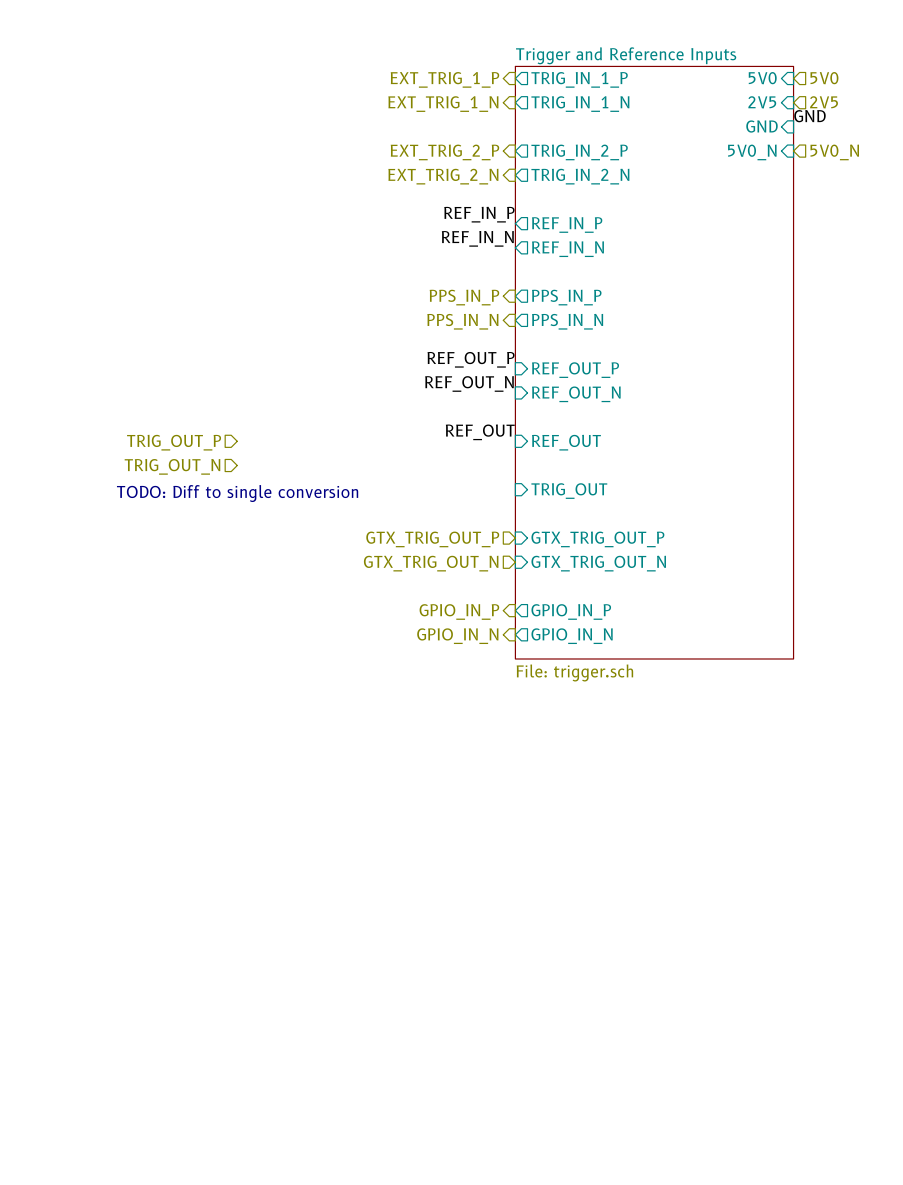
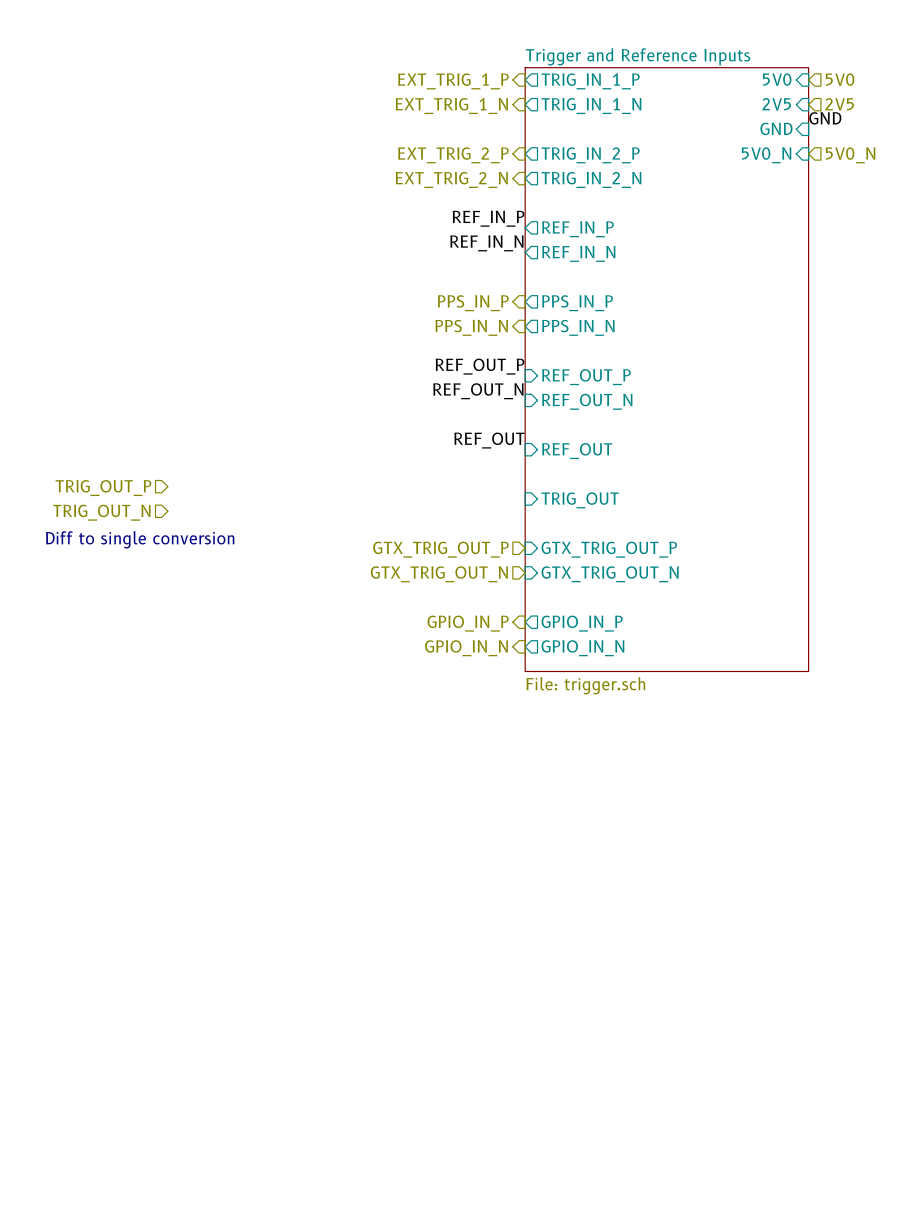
hierarchical label position: TRIG_OUT_P (174, 442) -> TRIG_OUT_P (103, 488)
hierarchical label position: TRIG_OUT_N (172, 466) -> TRIG_OUT_N (101, 512)
text: TODO: Diff to single conversion (237, 493) -> none
text: none -> Diff to single conversion (140, 539)

